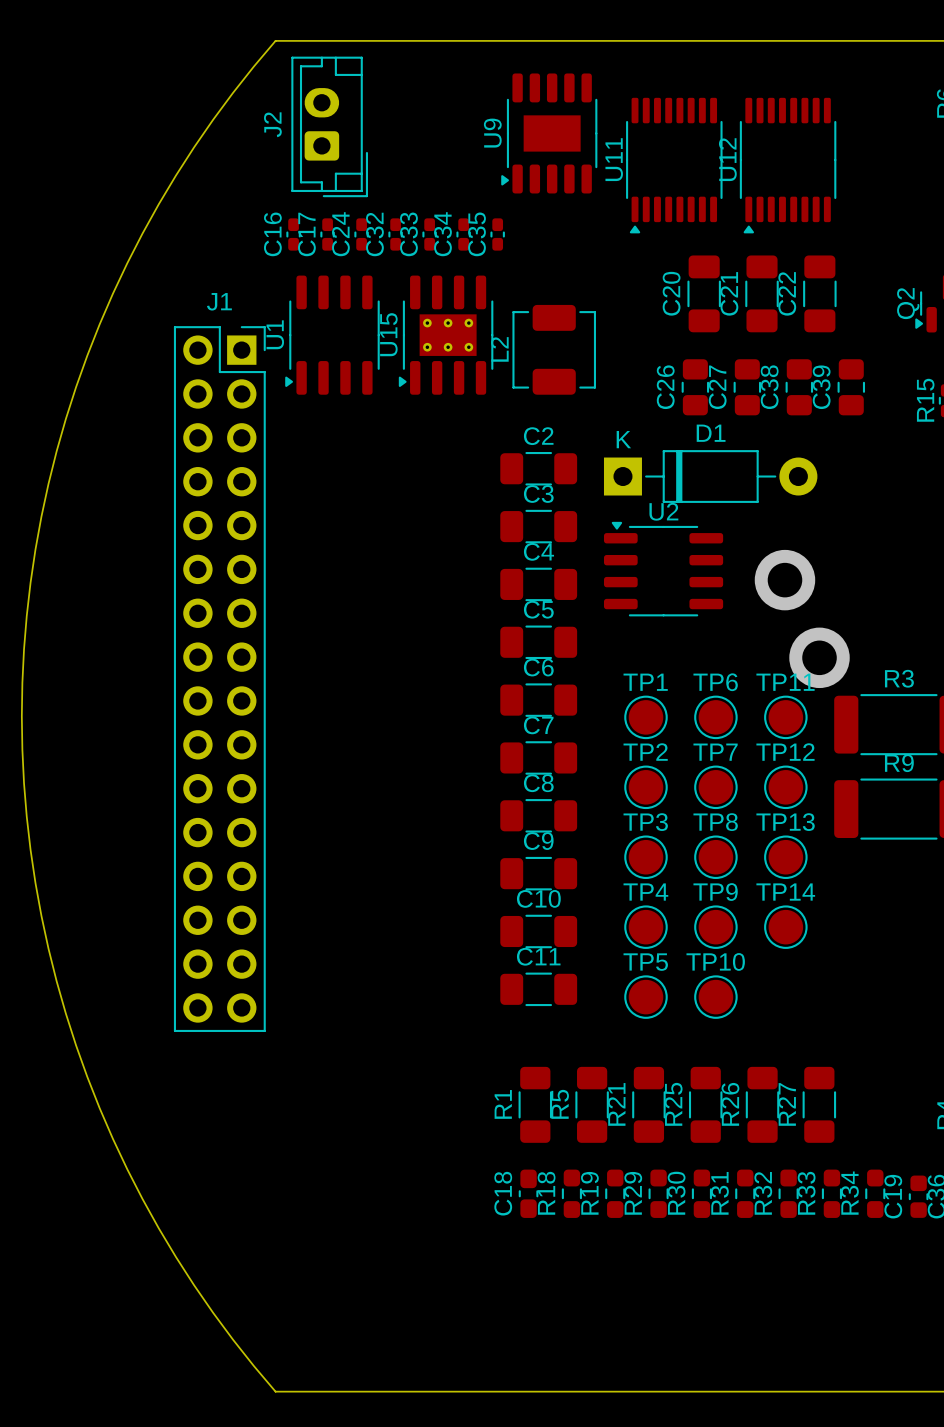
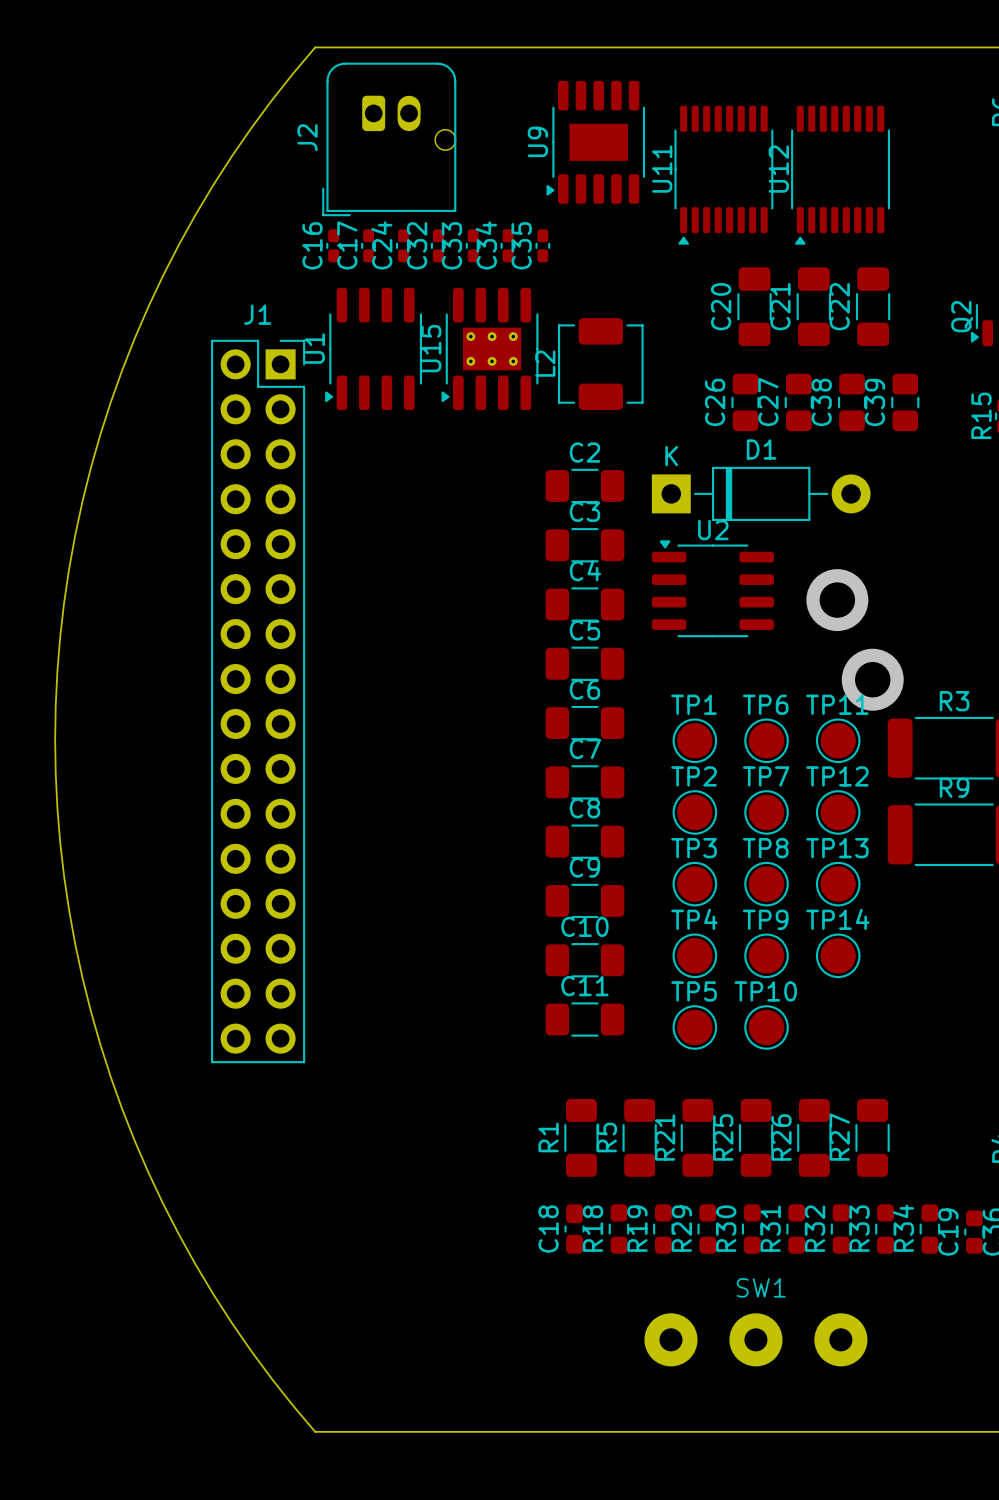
J2 footprint: [291, 56, 368, 198] -> [322, 62, 457, 217]
SW1: none -> (755, 1339)

